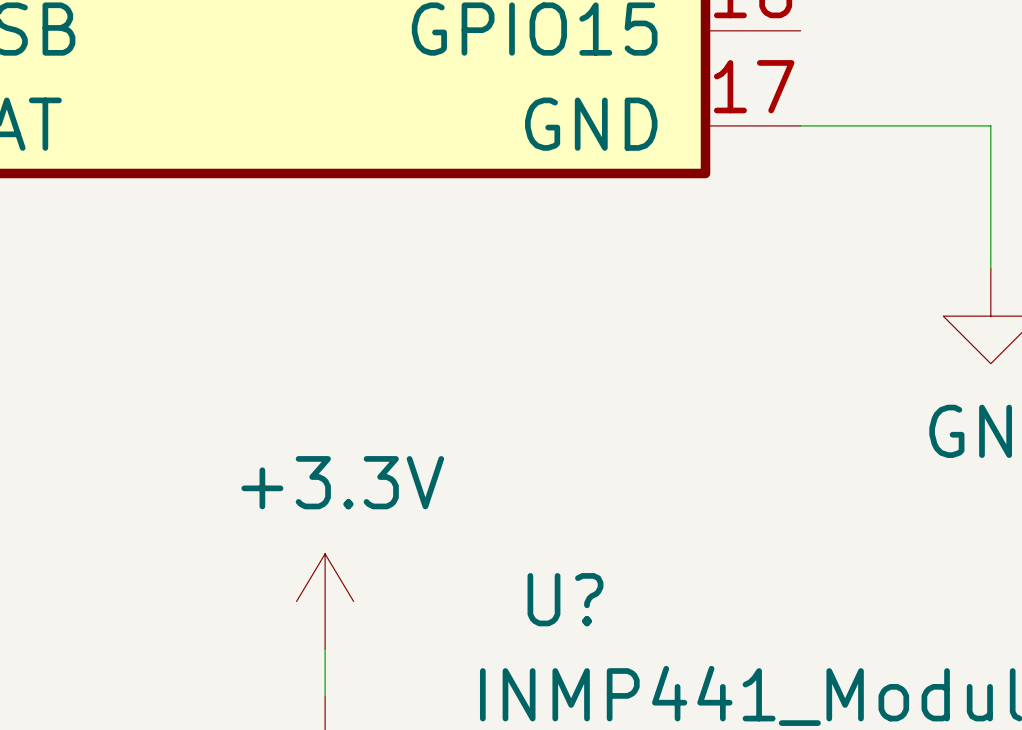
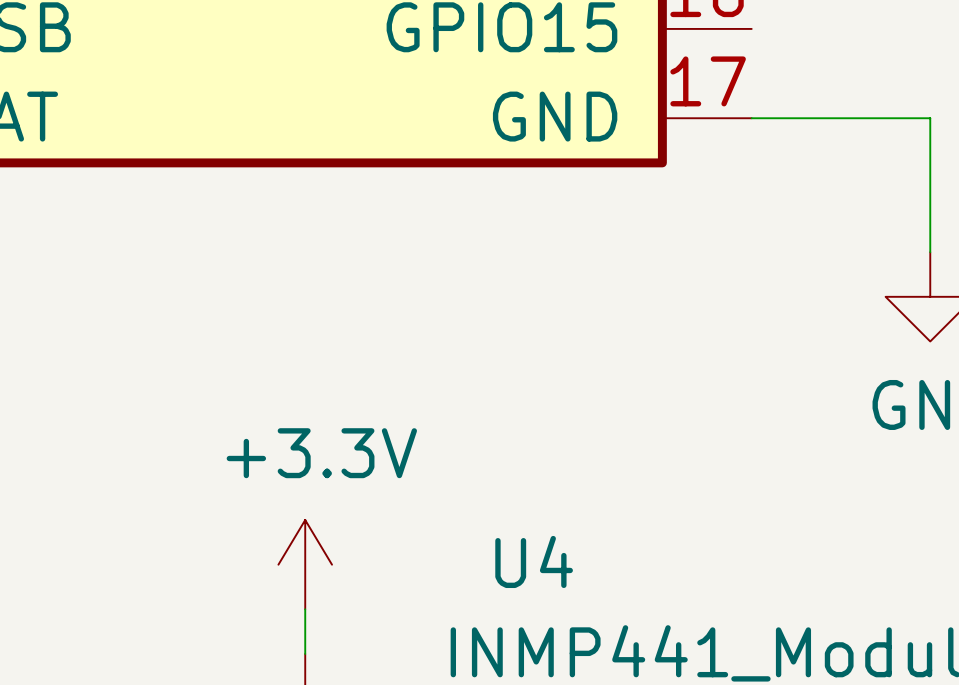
U? name: U? (565, 599) -> U4 (534, 561)

